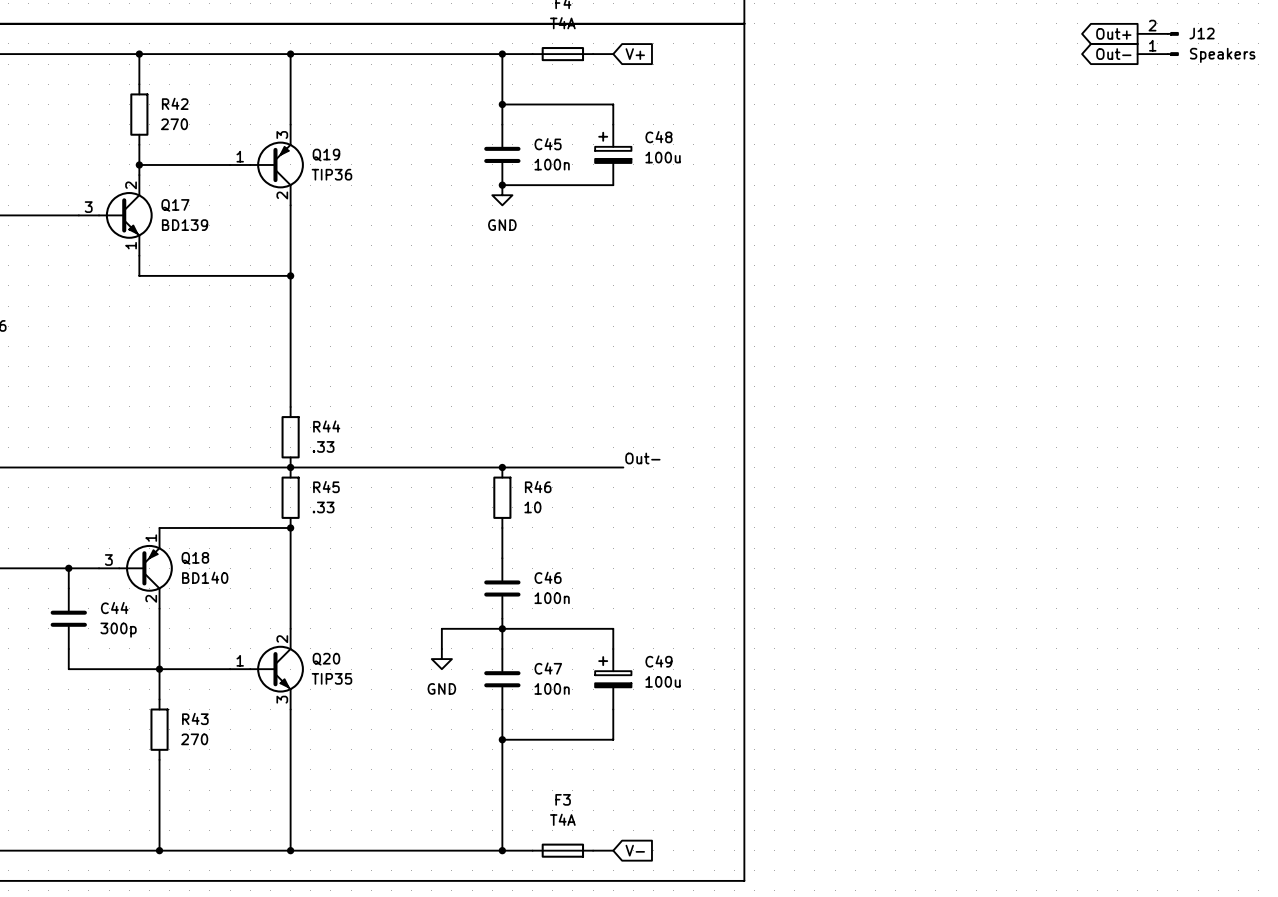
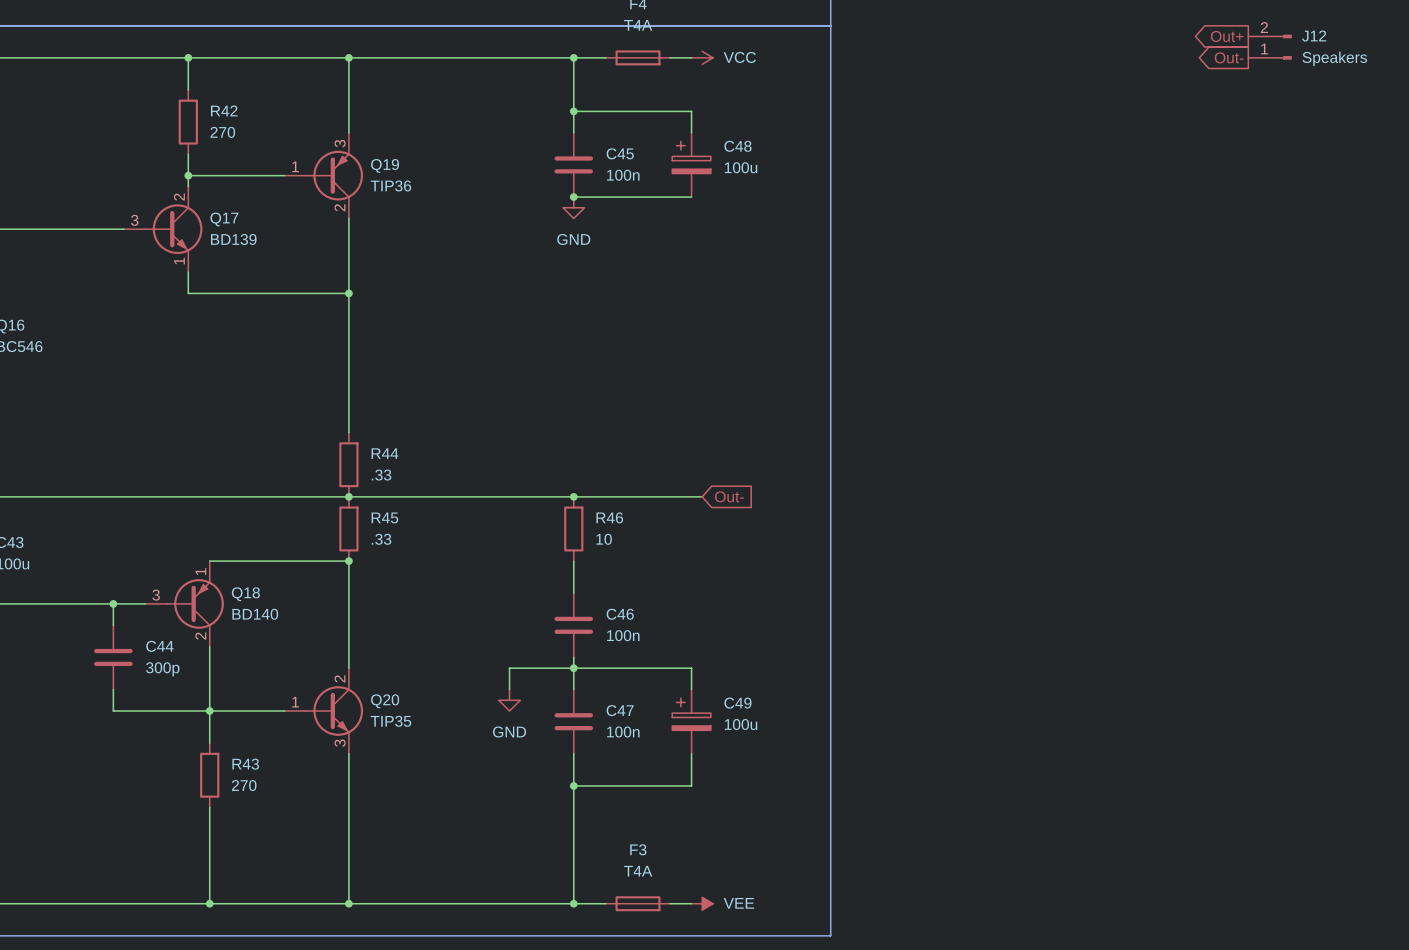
power symbol: none -> VCC (702, 57)
global label: V+ (635, 54) -> none
label: Out- (642, 458) -> none
global label: none -> Out- (729, 496)
power symbol: none -> VEE (702, 903)
global label: V- (635, 850) -> none

